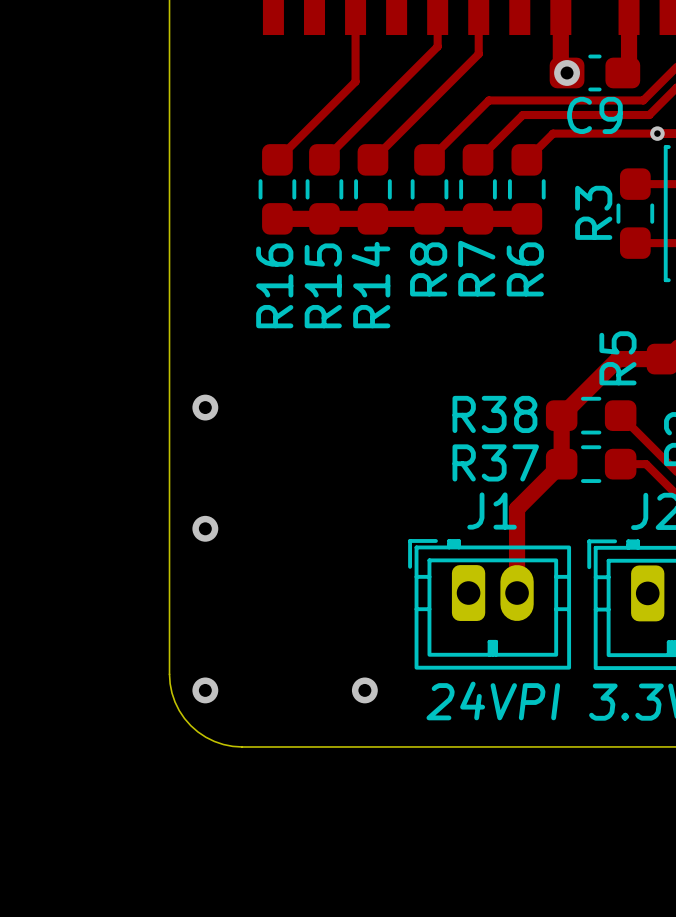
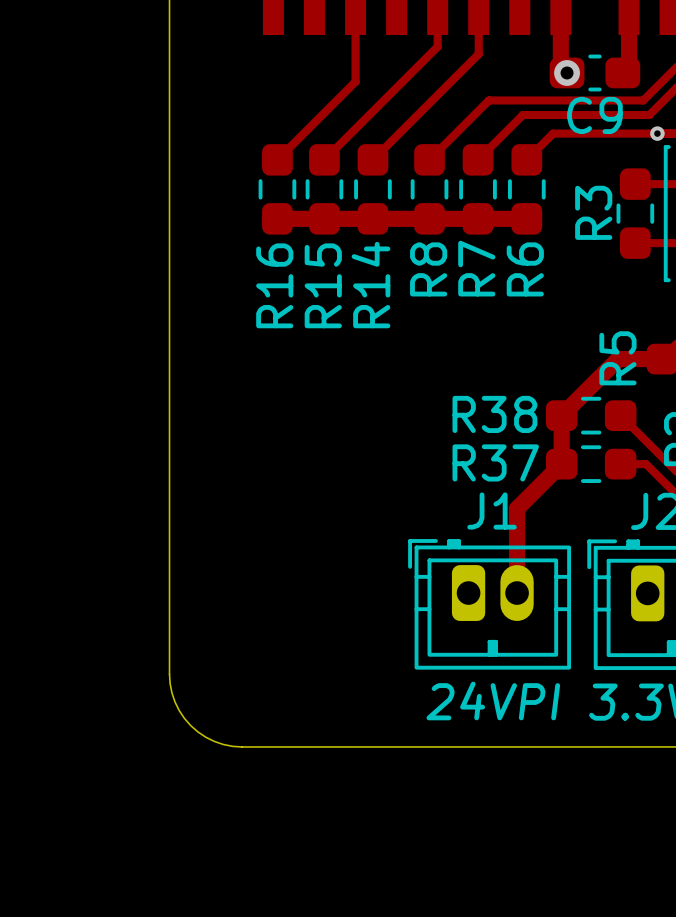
via: (205, 407) -> none
via: (205, 528) -> none
via: (205, 690) -> none
via: (364, 690) -> none

